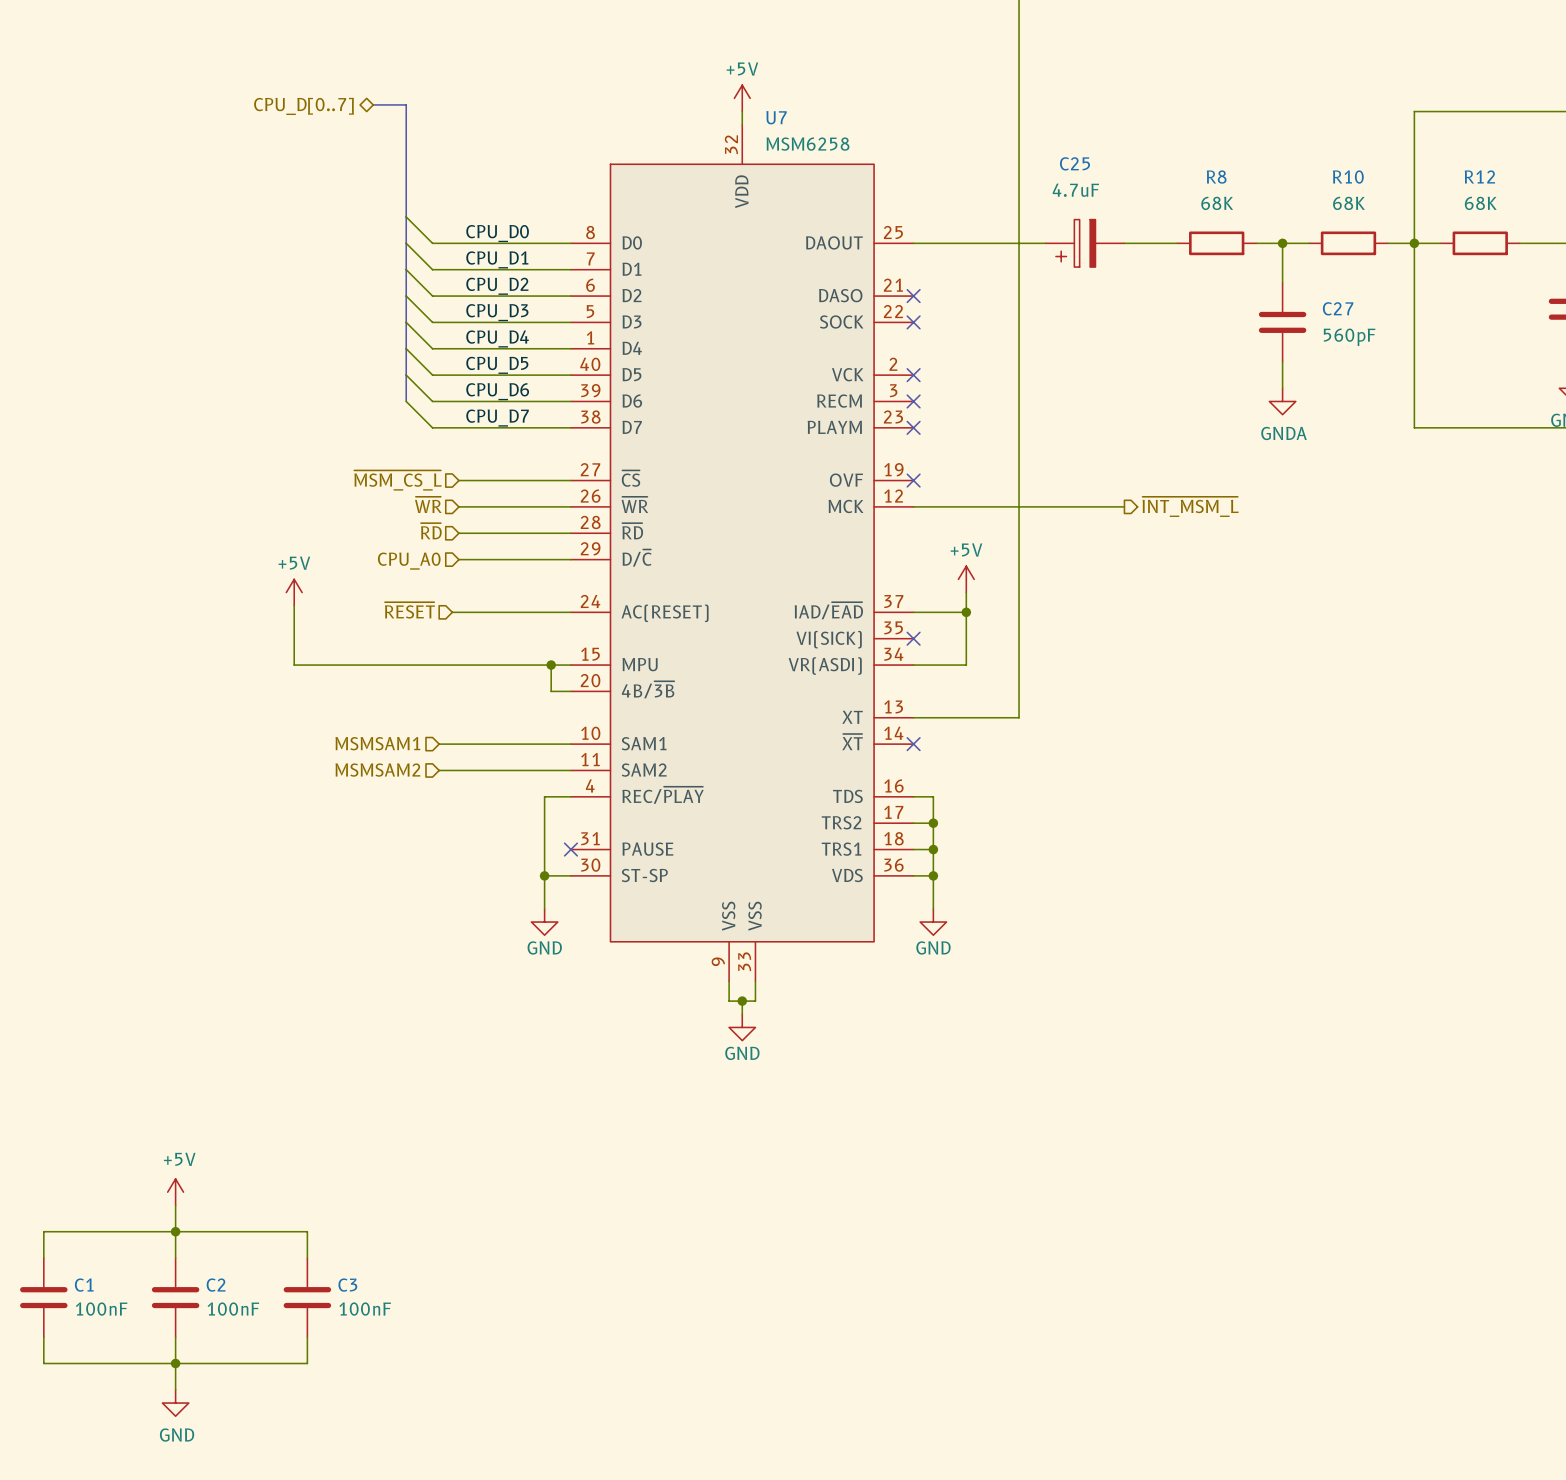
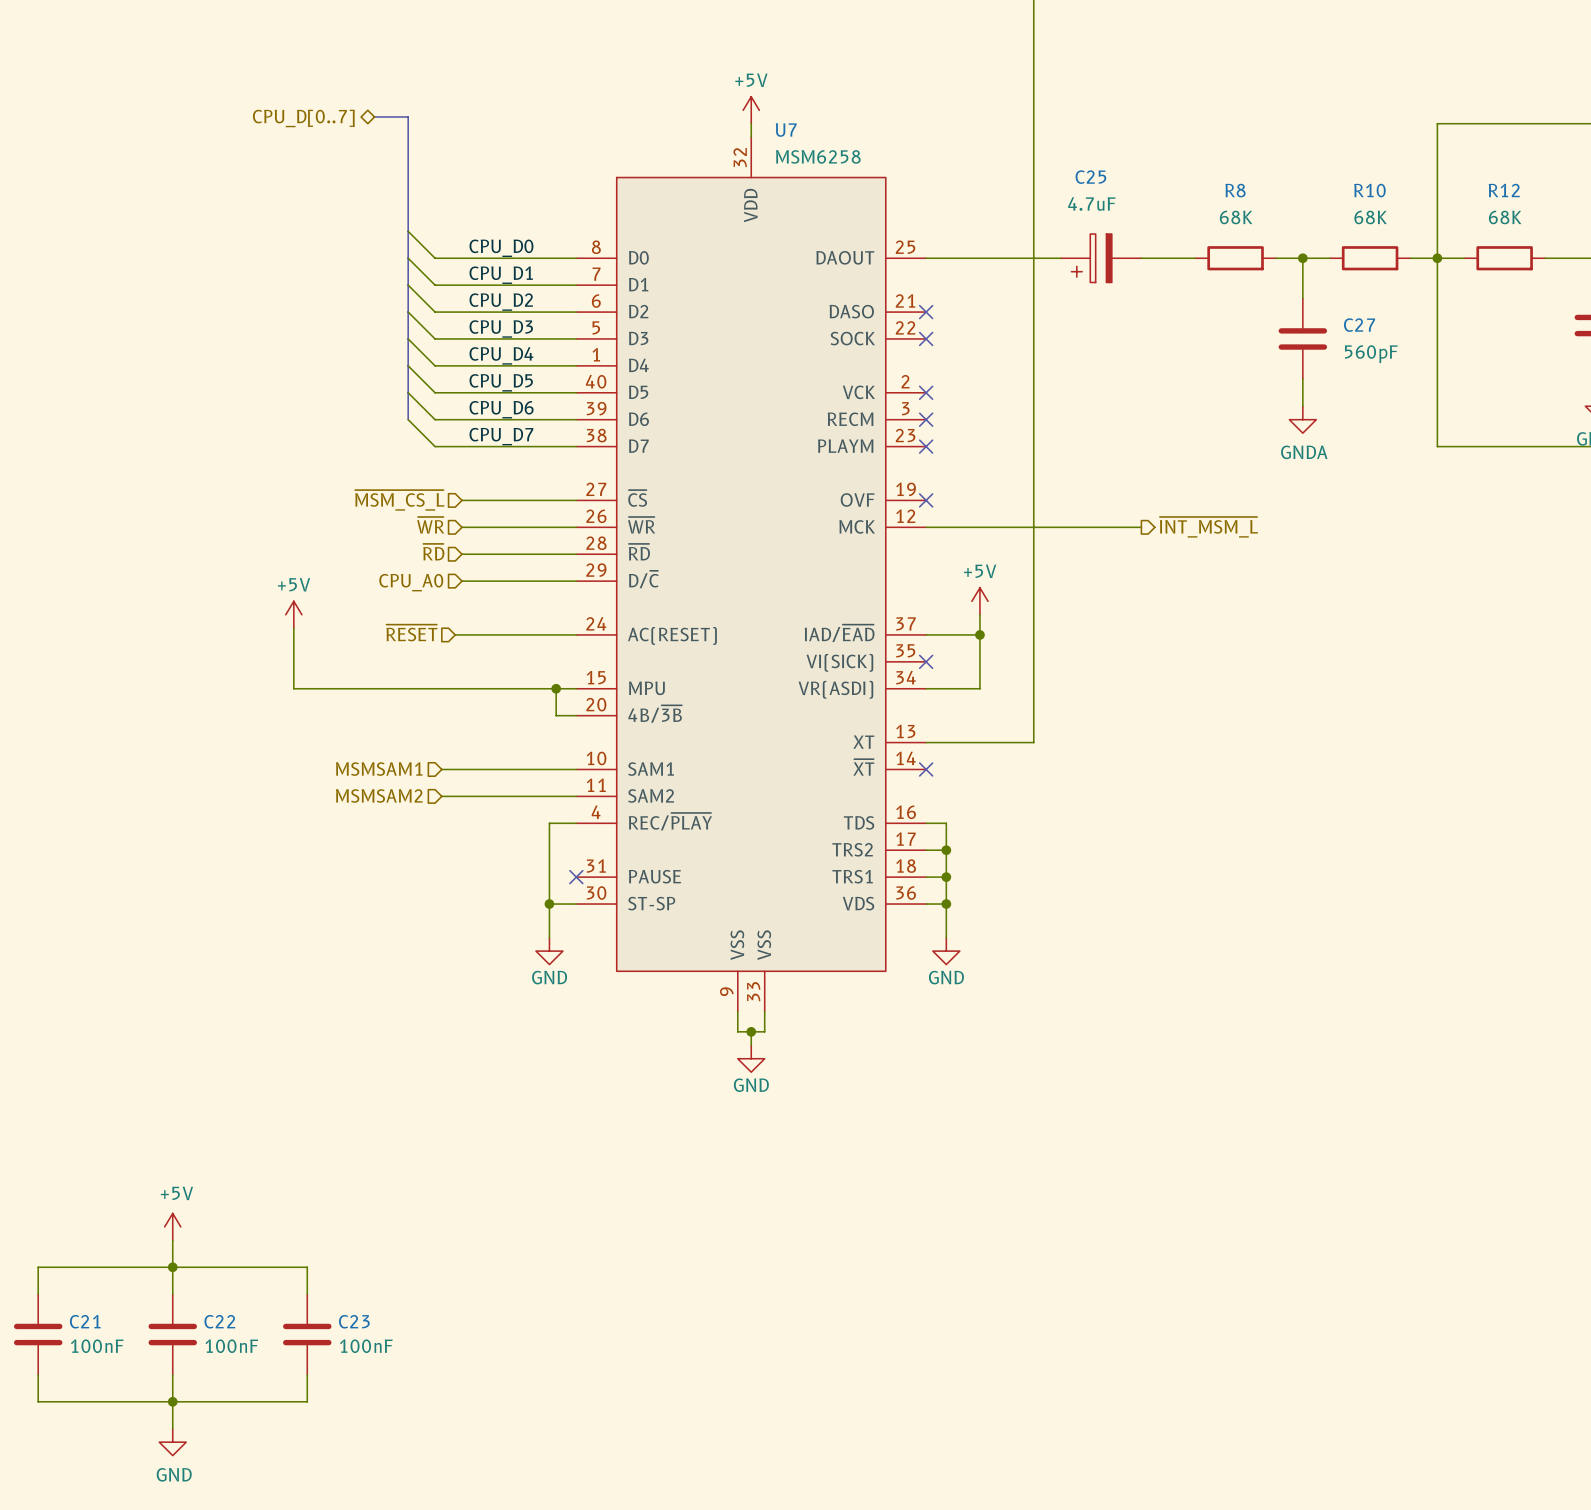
C1 name: C1 (84, 1285) -> C21 (85, 1321)
C2 name: C2 (216, 1285) -> C22 (219, 1321)
C3 name: C3 (347, 1285) -> C23 (354, 1321)

